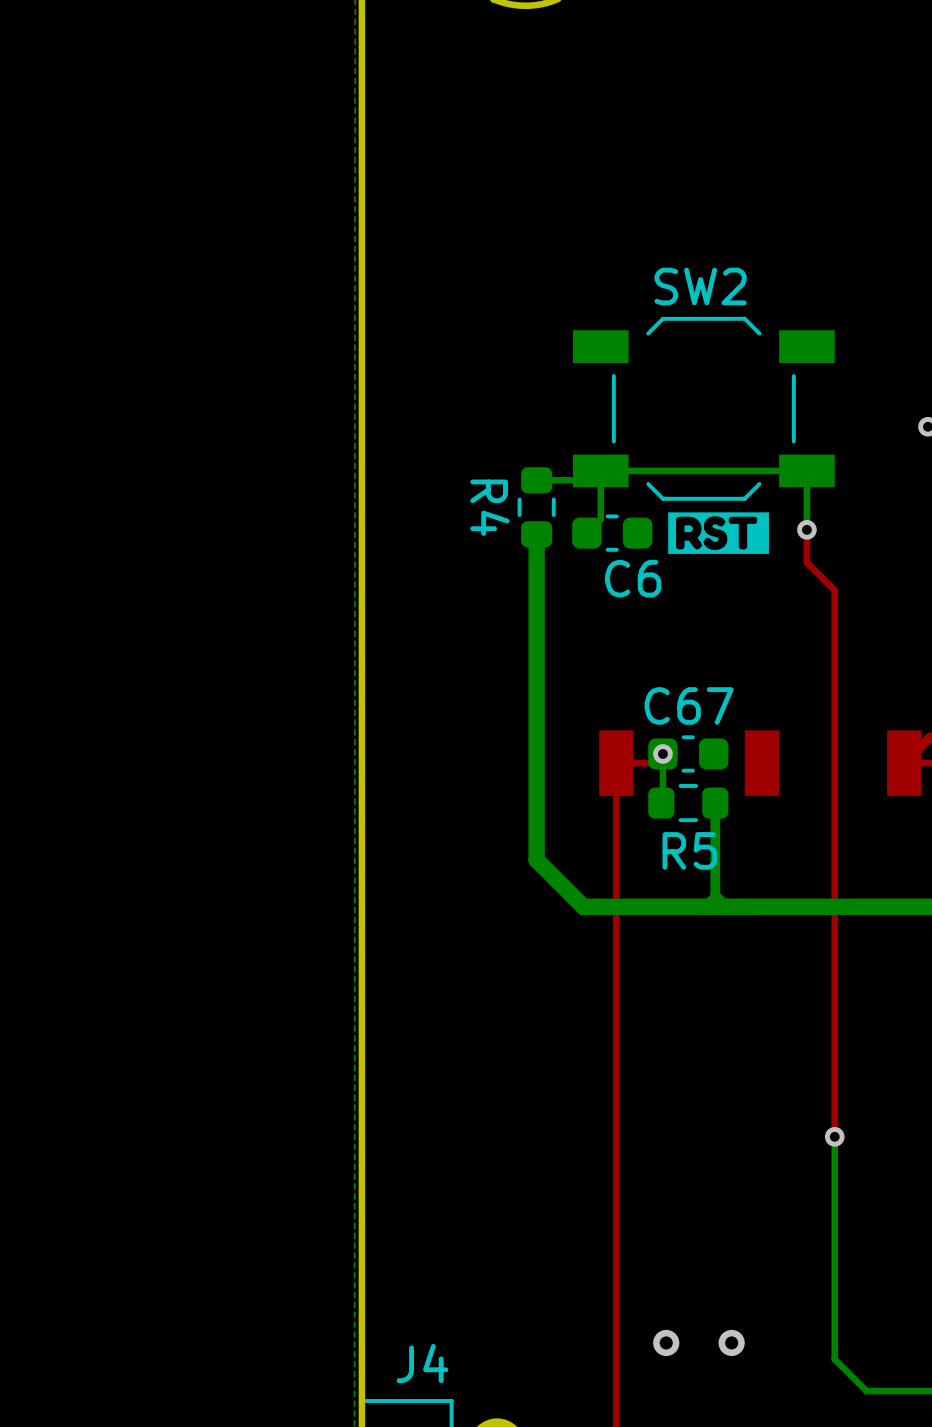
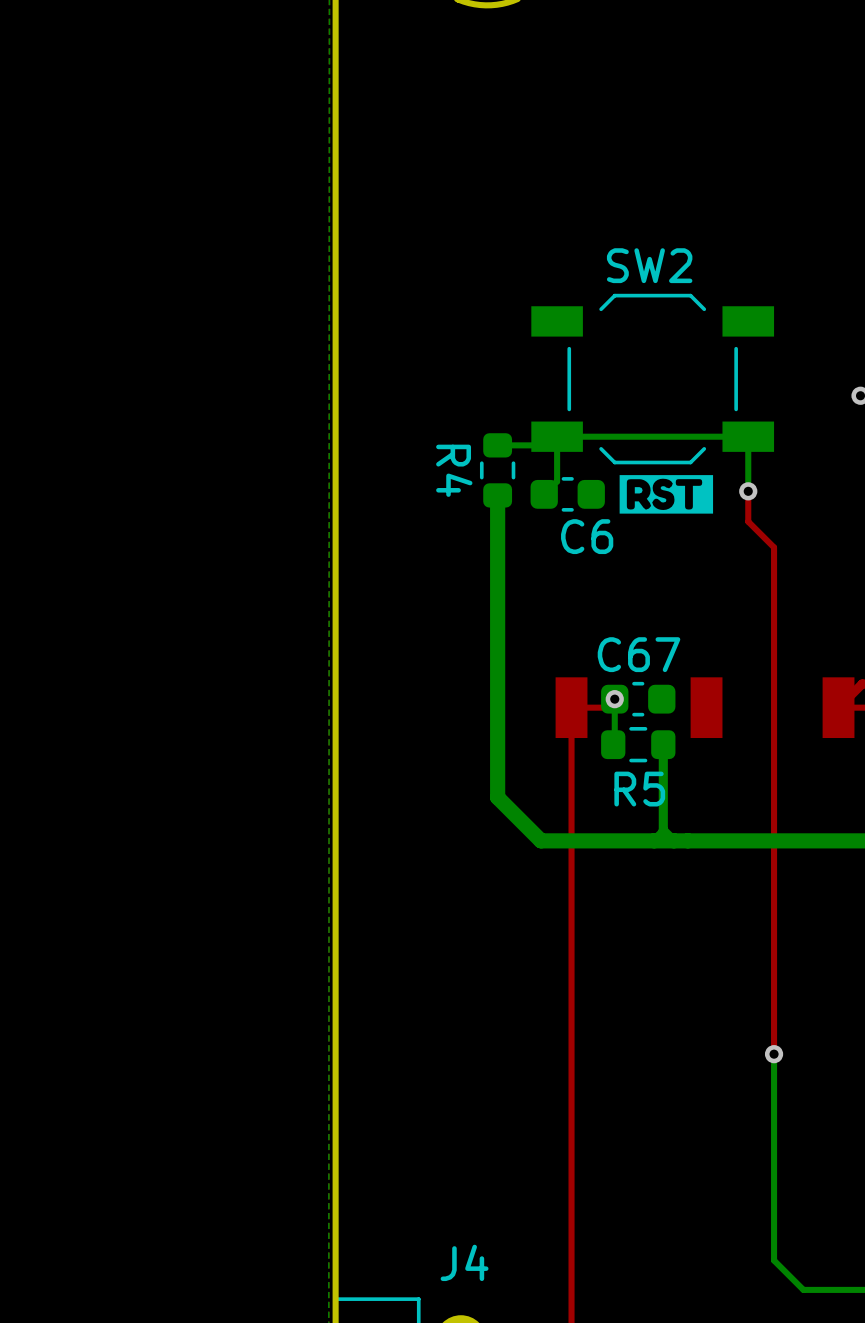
via: (666, 1342) -> none
via: (731, 1342) -> none
J4 name position: J4 (422, 1363) -> J4 (464, 1262)

